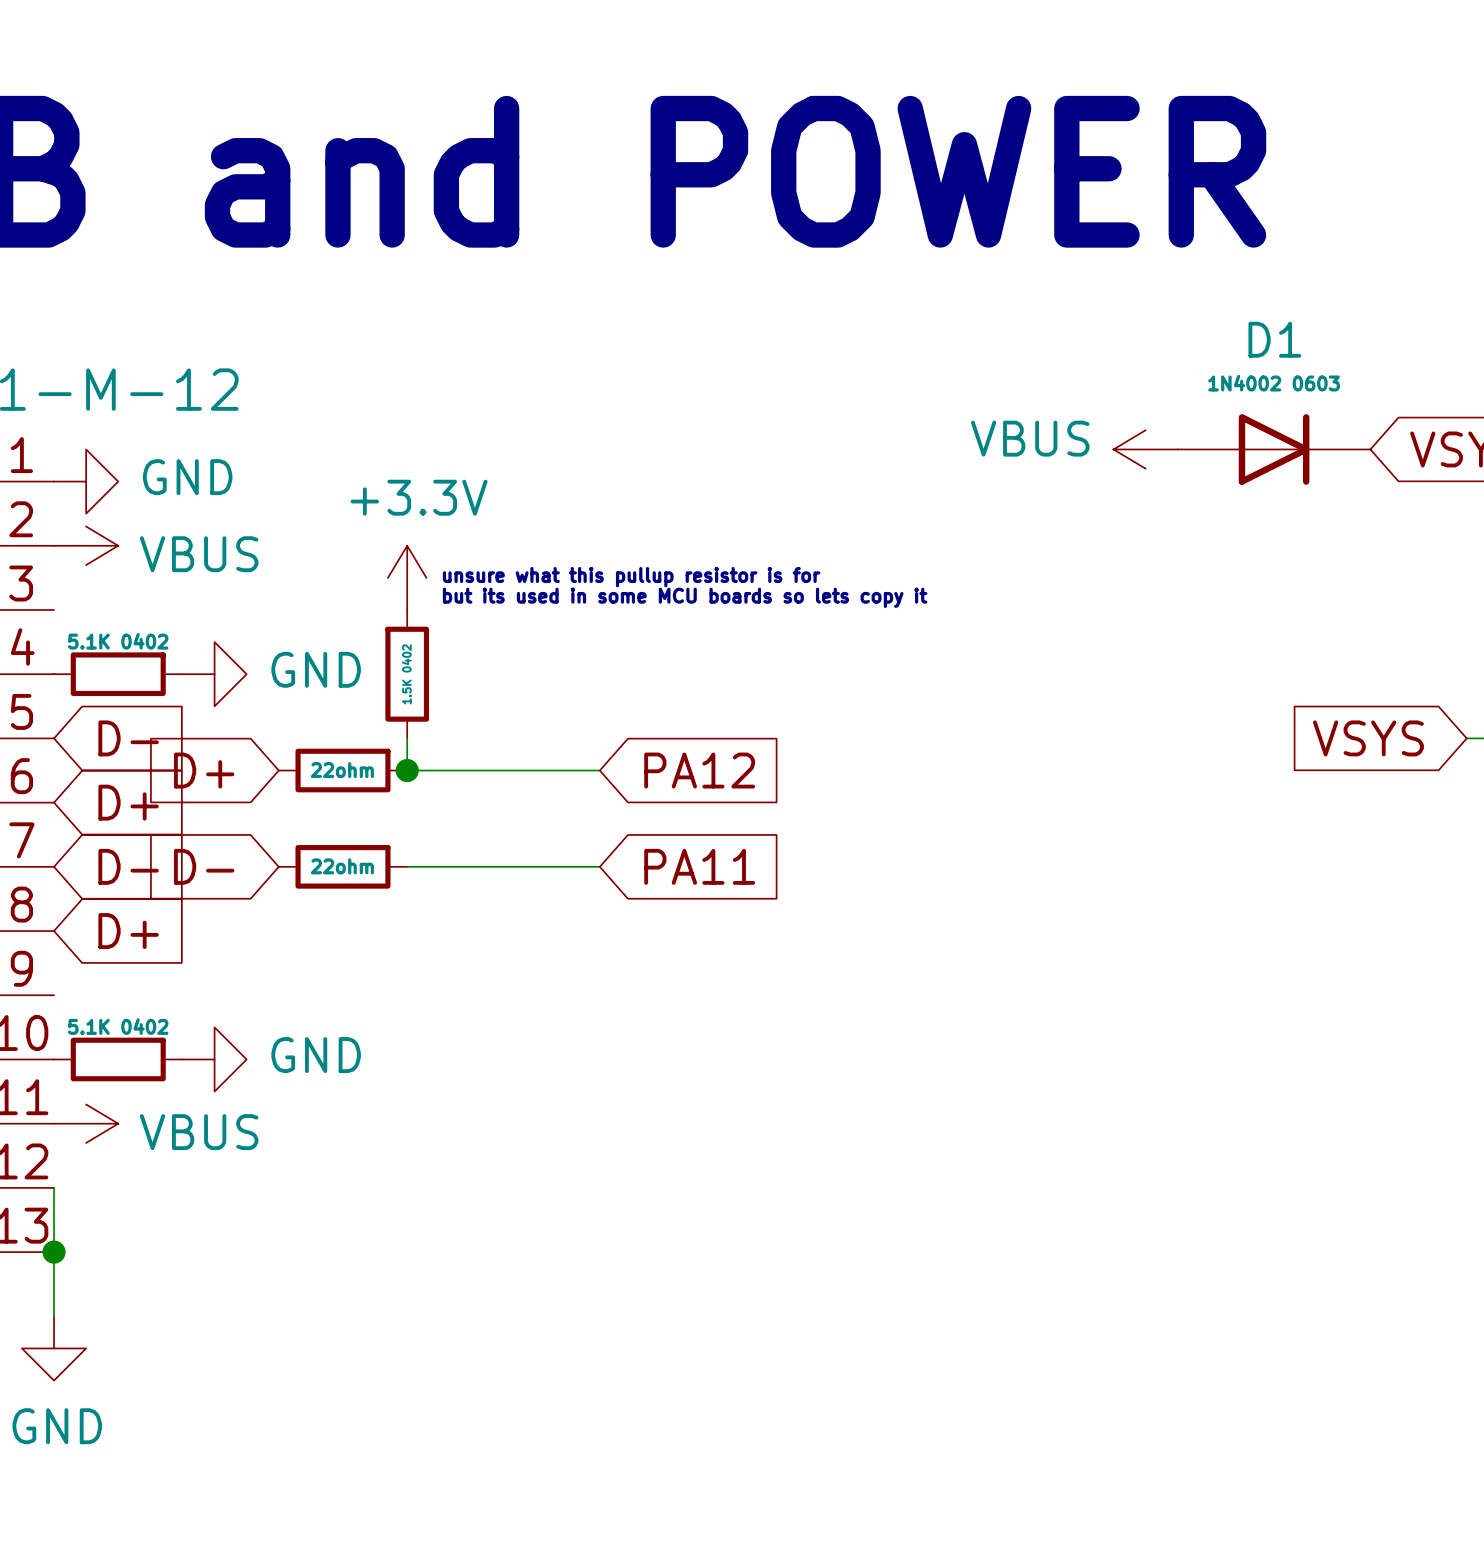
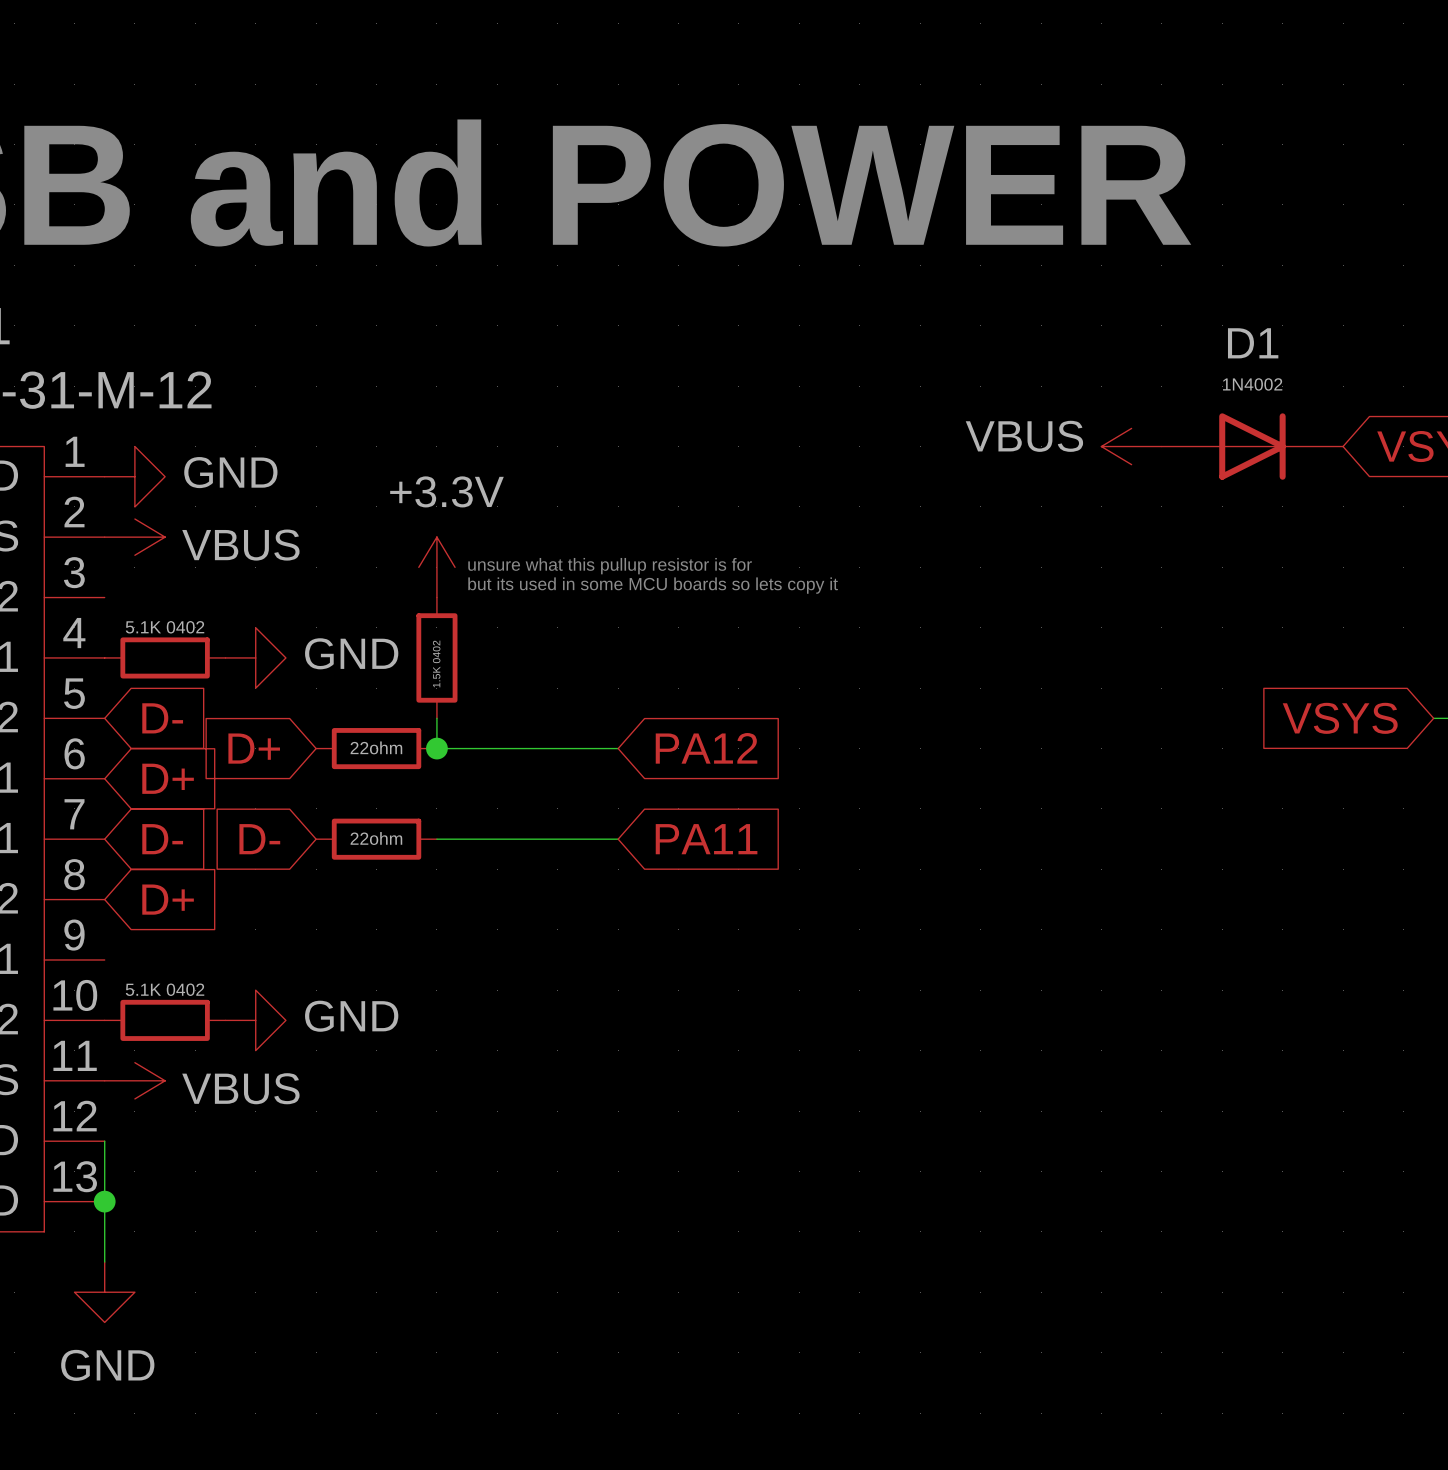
D1 value: 1N4002 0603 (1274, 383) -> 1N4002 (1252, 384)

